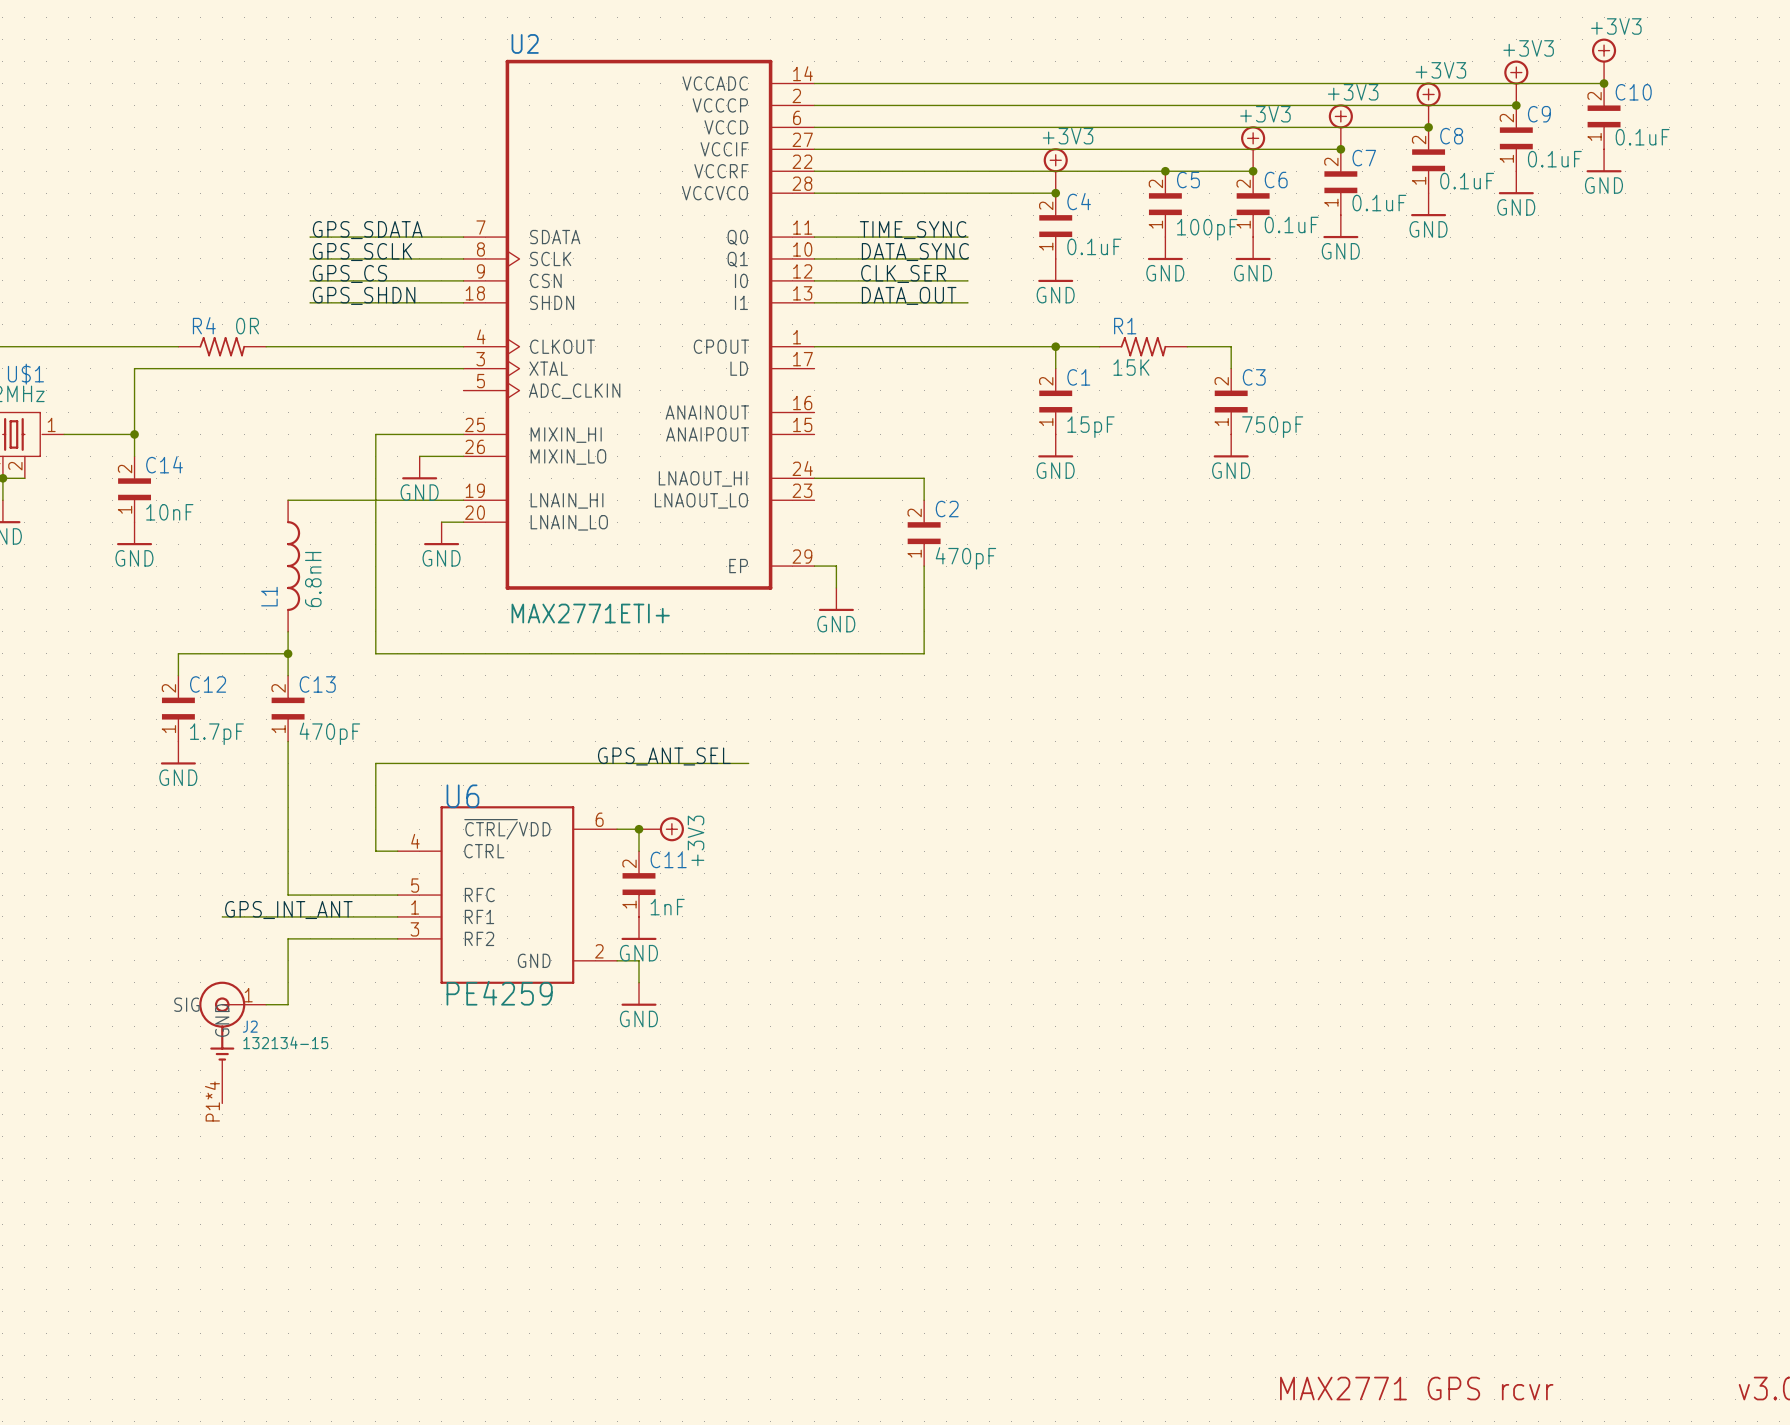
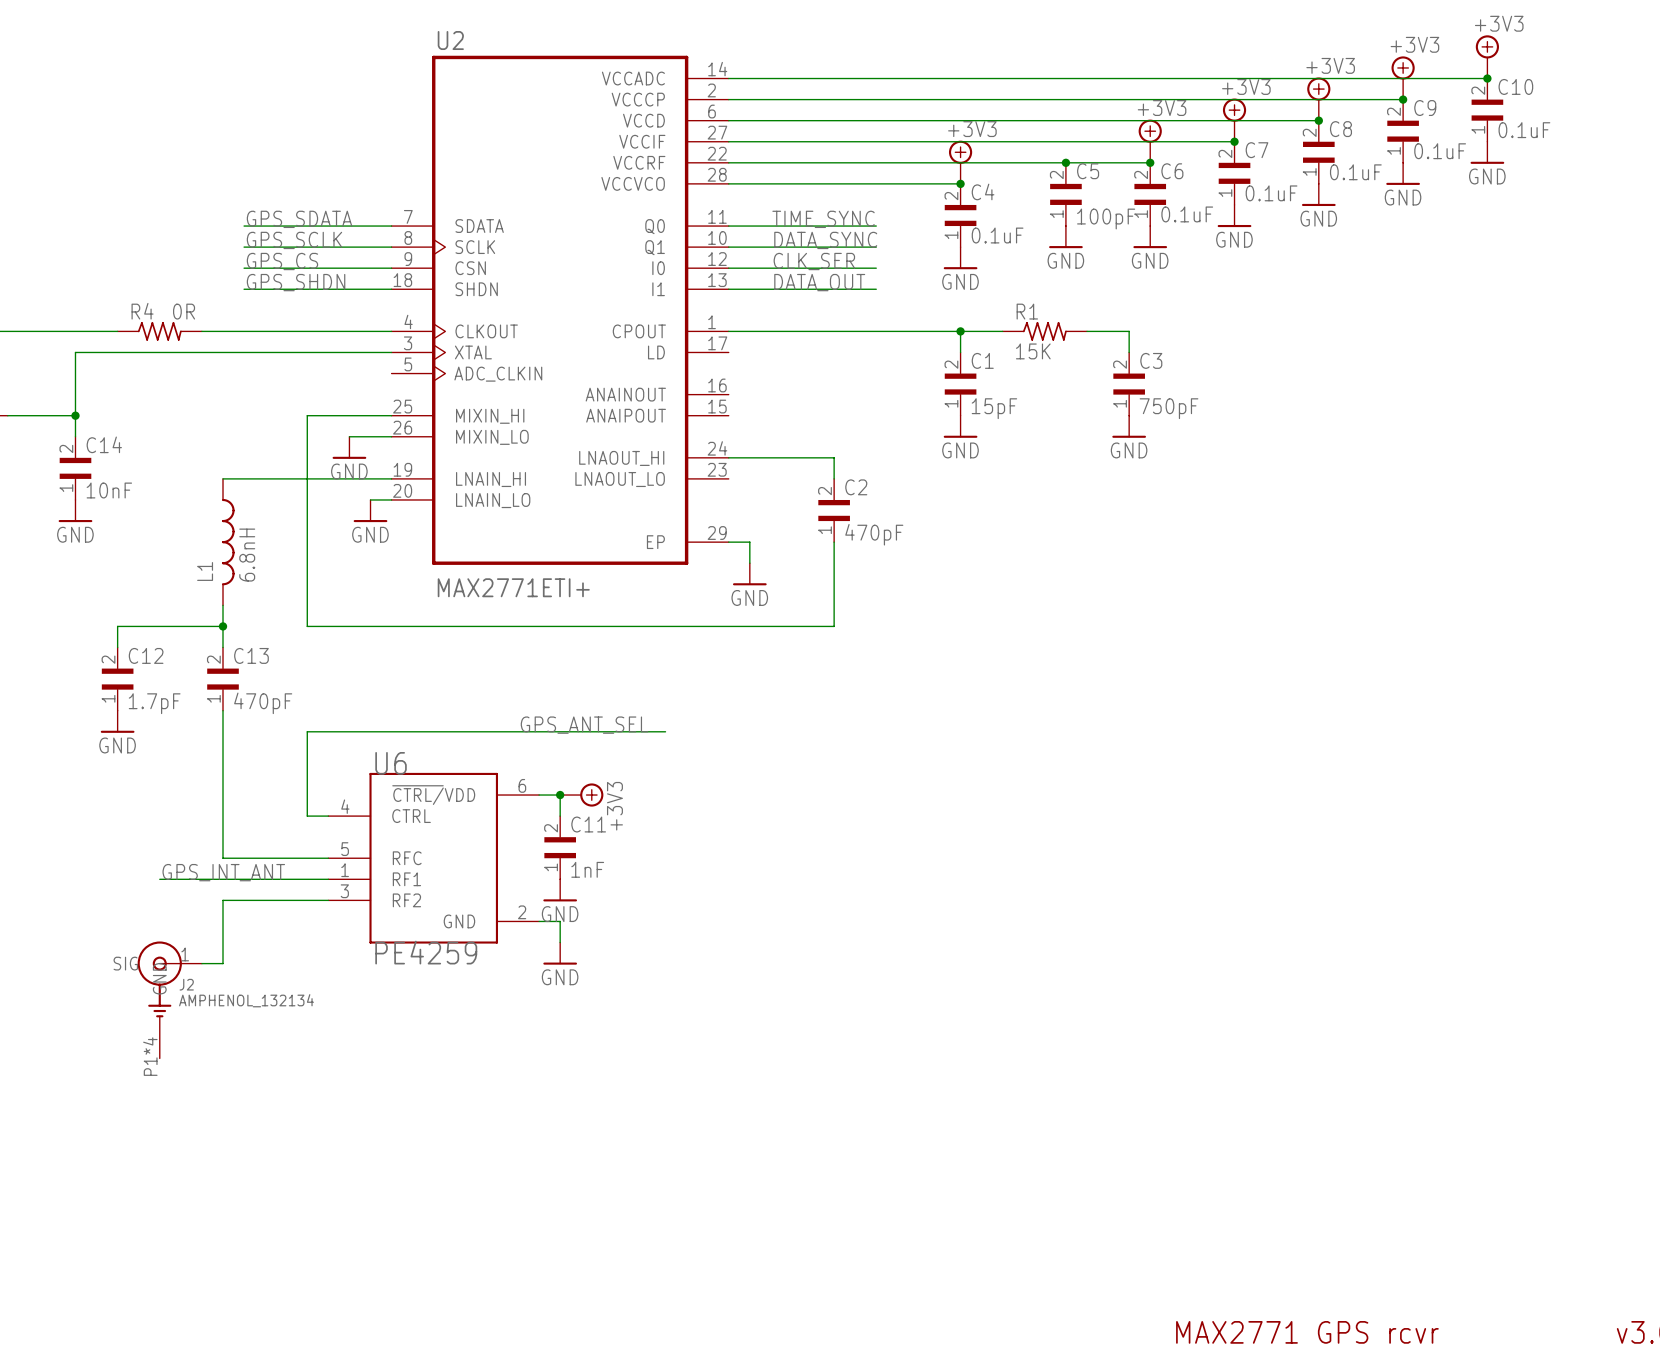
J2 value: 132134-15 (285, 1042) -> AMPHENOL_132134 (246, 1000)

